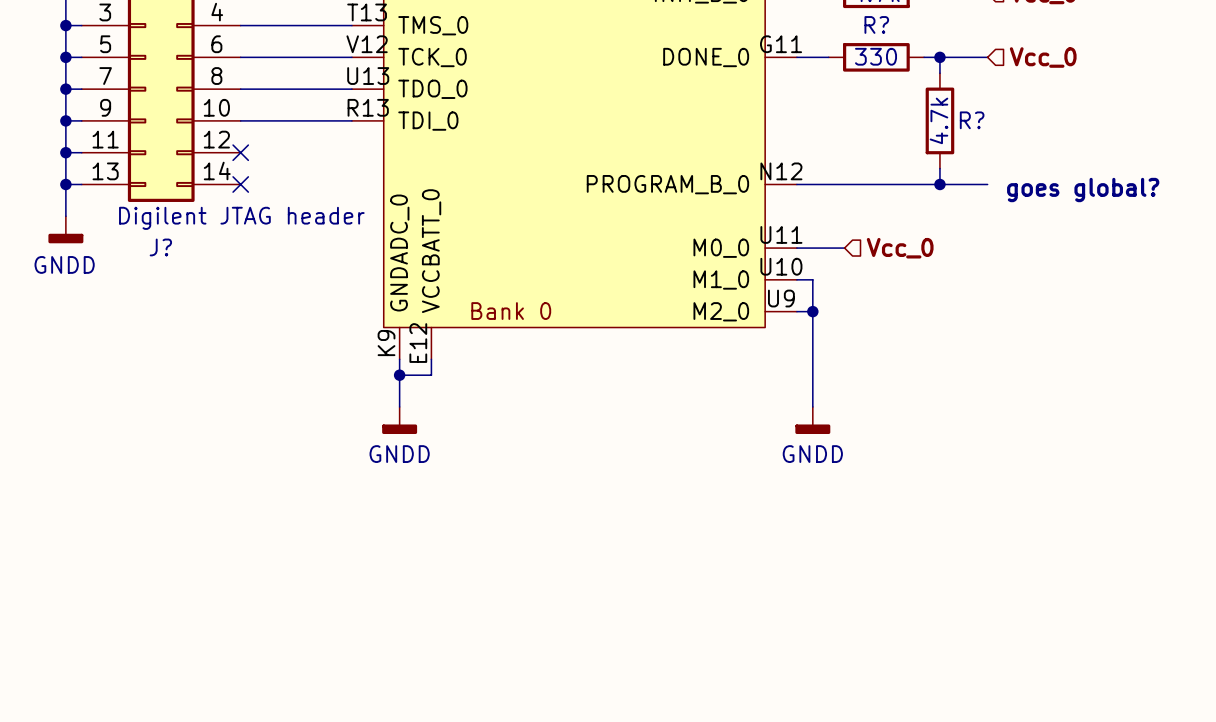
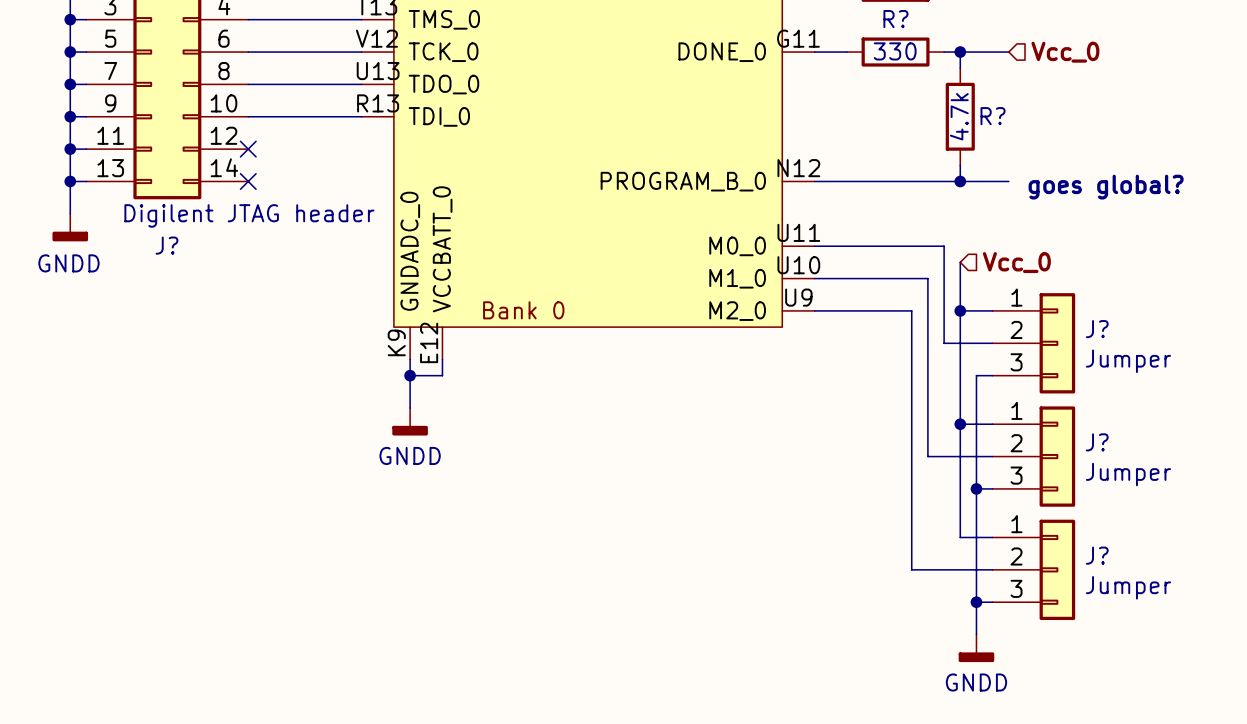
wire: none -> (863, 246) (944, 246) (944, 343) (992, 343)
hierarchical label position: Vcc_0 (900, 248) -> Vcc_0 (1016, 262)
wire: none -> (960, 262) (960, 537) (992, 537)
wire: (812, 279) (812, 406) -> (830, 278) (927, 278) (927, 456) (992, 456)
wire: none -> (830, 310) (911, 310) (911, 569) (992, 569)
junction: (812, 311) -> none
wire: none -> (960, 310) (992, 310)
junction: none -> (960, 310)
J?: none -> Jumper (1033, 343)
wire: none -> (992, 375) (976, 375) (976, 634)
power symbol position: GNDD (812, 420) -> GNDD (976, 648)
wire: none -> (960, 424) (992, 424)
junction: none -> (960, 424)
J?: none -> Jumper (1033, 456)
wire: none -> (976, 488) (992, 488)
junction: none -> (976, 488)
J?: none -> Jumper (1033, 569)
wire: none -> (976, 602) (992, 602)
junction: none -> (976, 602)

